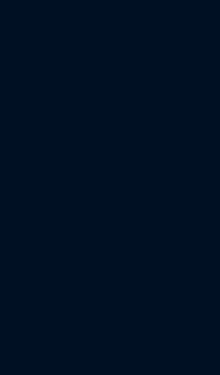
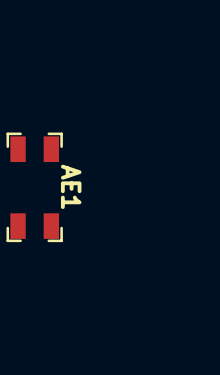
AE1: none -> (34, 187)

